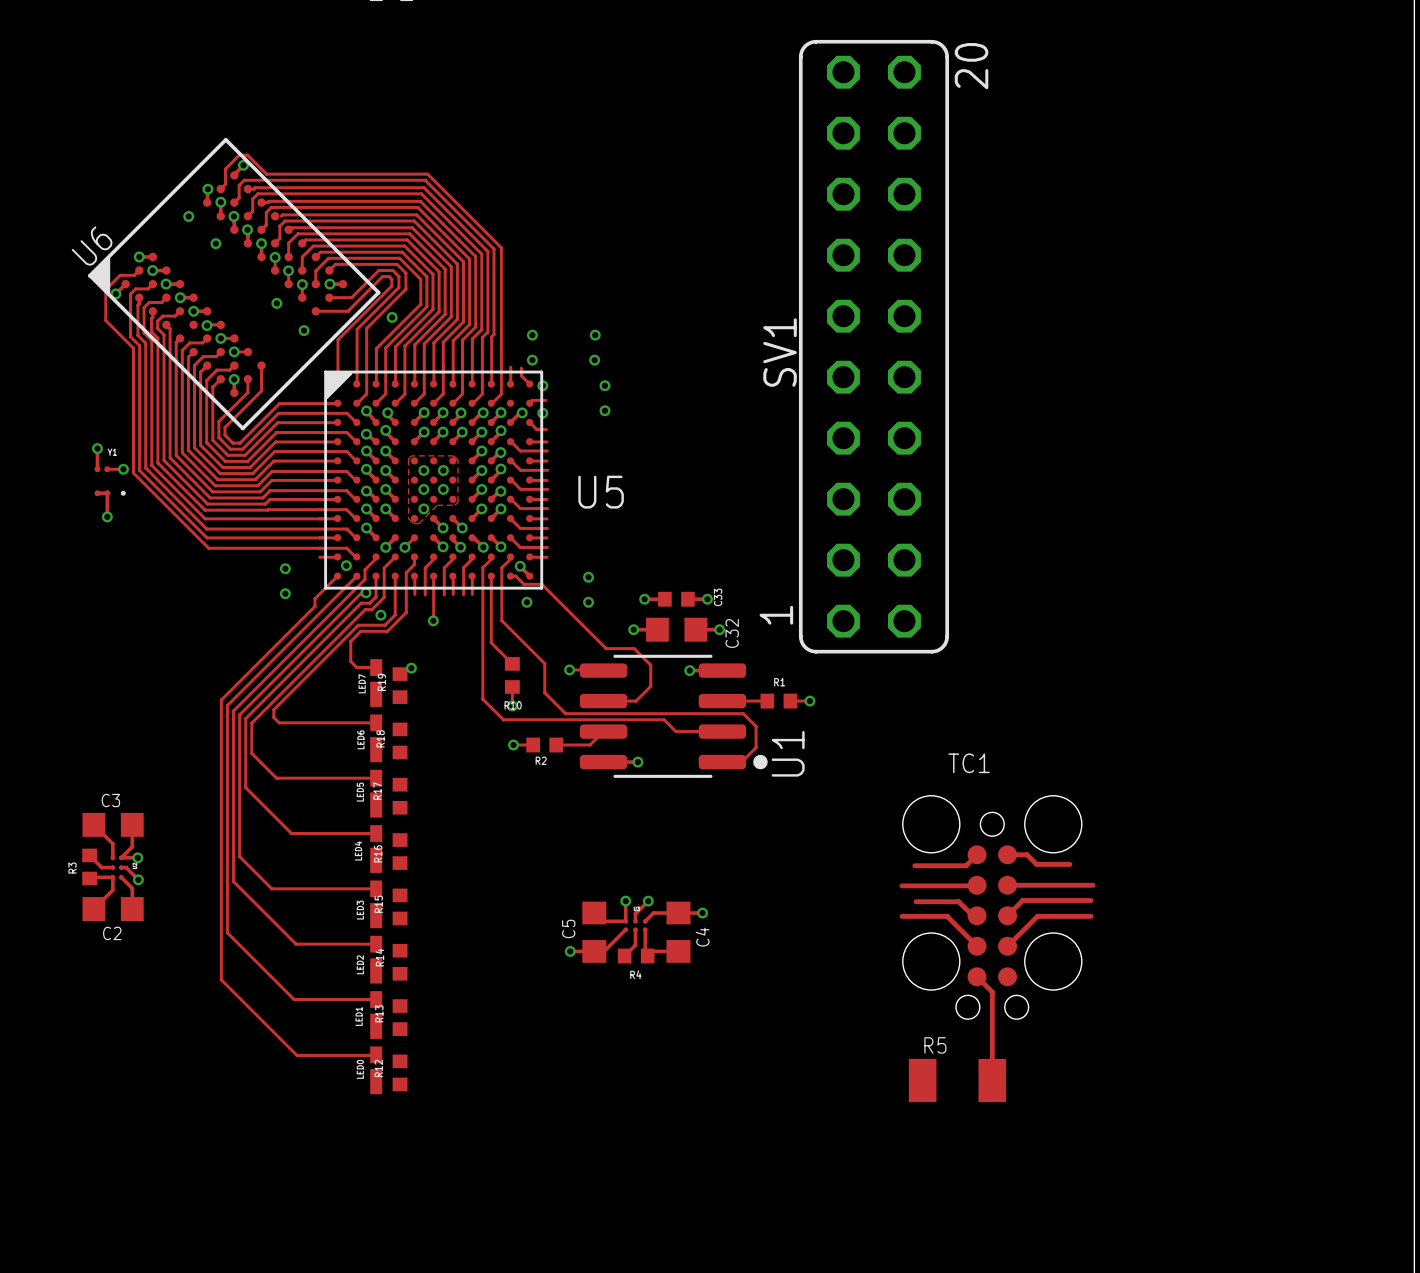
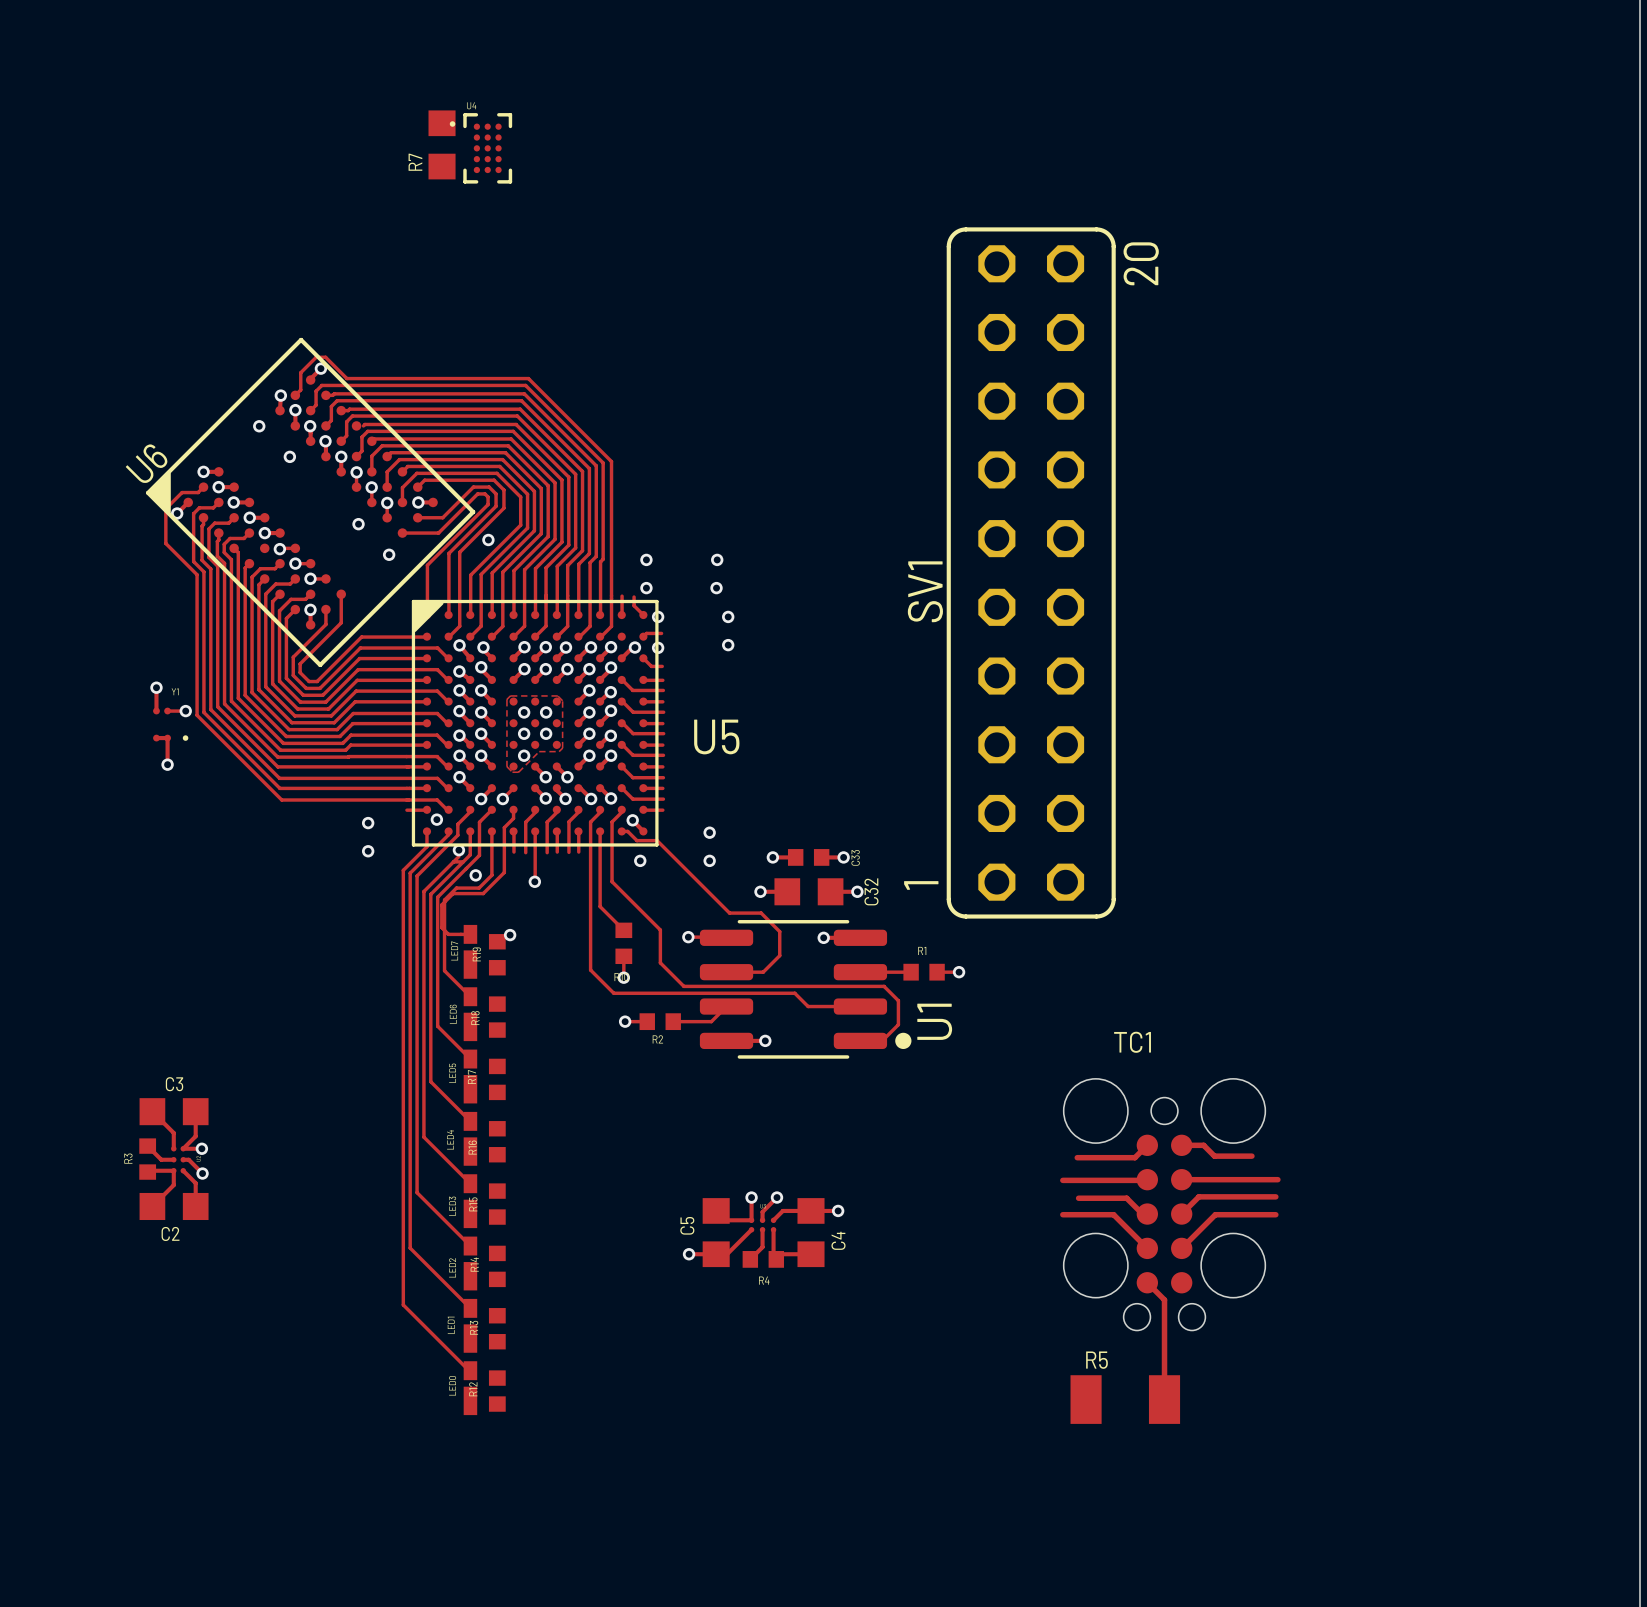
track: (337, 576) (314, 598) (314, 606) (221, 700) (221, 979) (296, 1055) (375, 1055) -> (426, 831) (426, 846) (403, 870) (403, 1304) (469, 1371)
track: (356, 576) (227, 705) (227, 932) (294, 999) (376, 999) -> (448, 831) (448, 834) (410, 873) (410, 1248) (470, 1308)
track: (365, 592) (361, 592) (239, 714) (239, 856) (271, 888) (376, 888) -> (423, 891) (423, 1137) (470, 1183)
track: (372, 609) (365, 609) (251, 723) (251, 753) (276, 778) (376, 778) -> (465, 869) (437, 897) (437, 1026) (470, 1059)
track: (328, 615) (233, 710) (233, 881) (296, 944) (376, 944) -> (417, 876) (417, 1192) (470, 1246)
track: (385, 625) (358, 625) (273, 709) (273, 717) (279, 722) (376, 722) -> (480, 886) (456, 888) (444, 900) (444, 970) (470, 996)
track: (334, 629) (245, 718) (245, 787) (291, 833) (376, 833) -> (463, 861) (430, 894) (430, 1081) (470, 1121)

